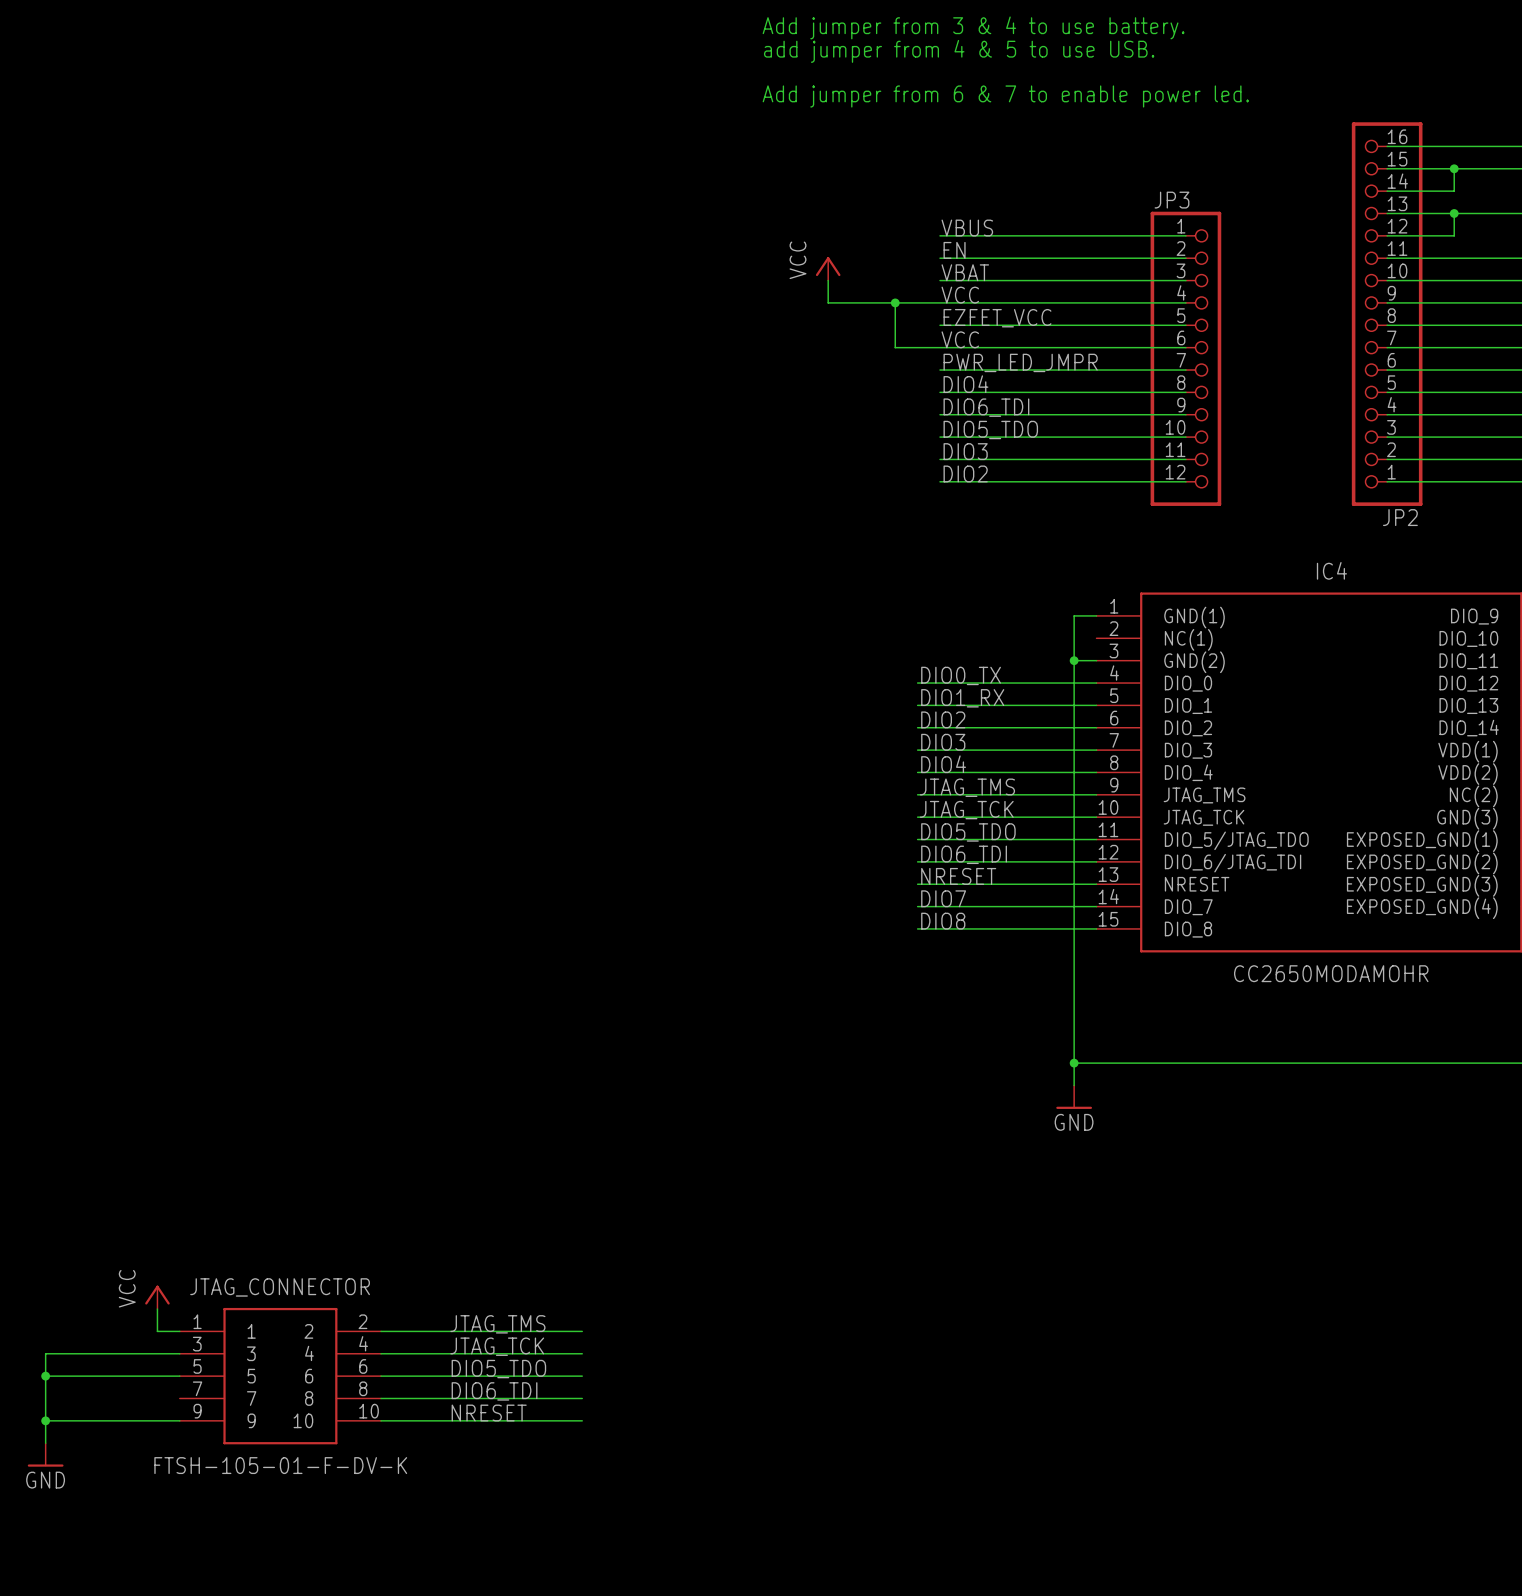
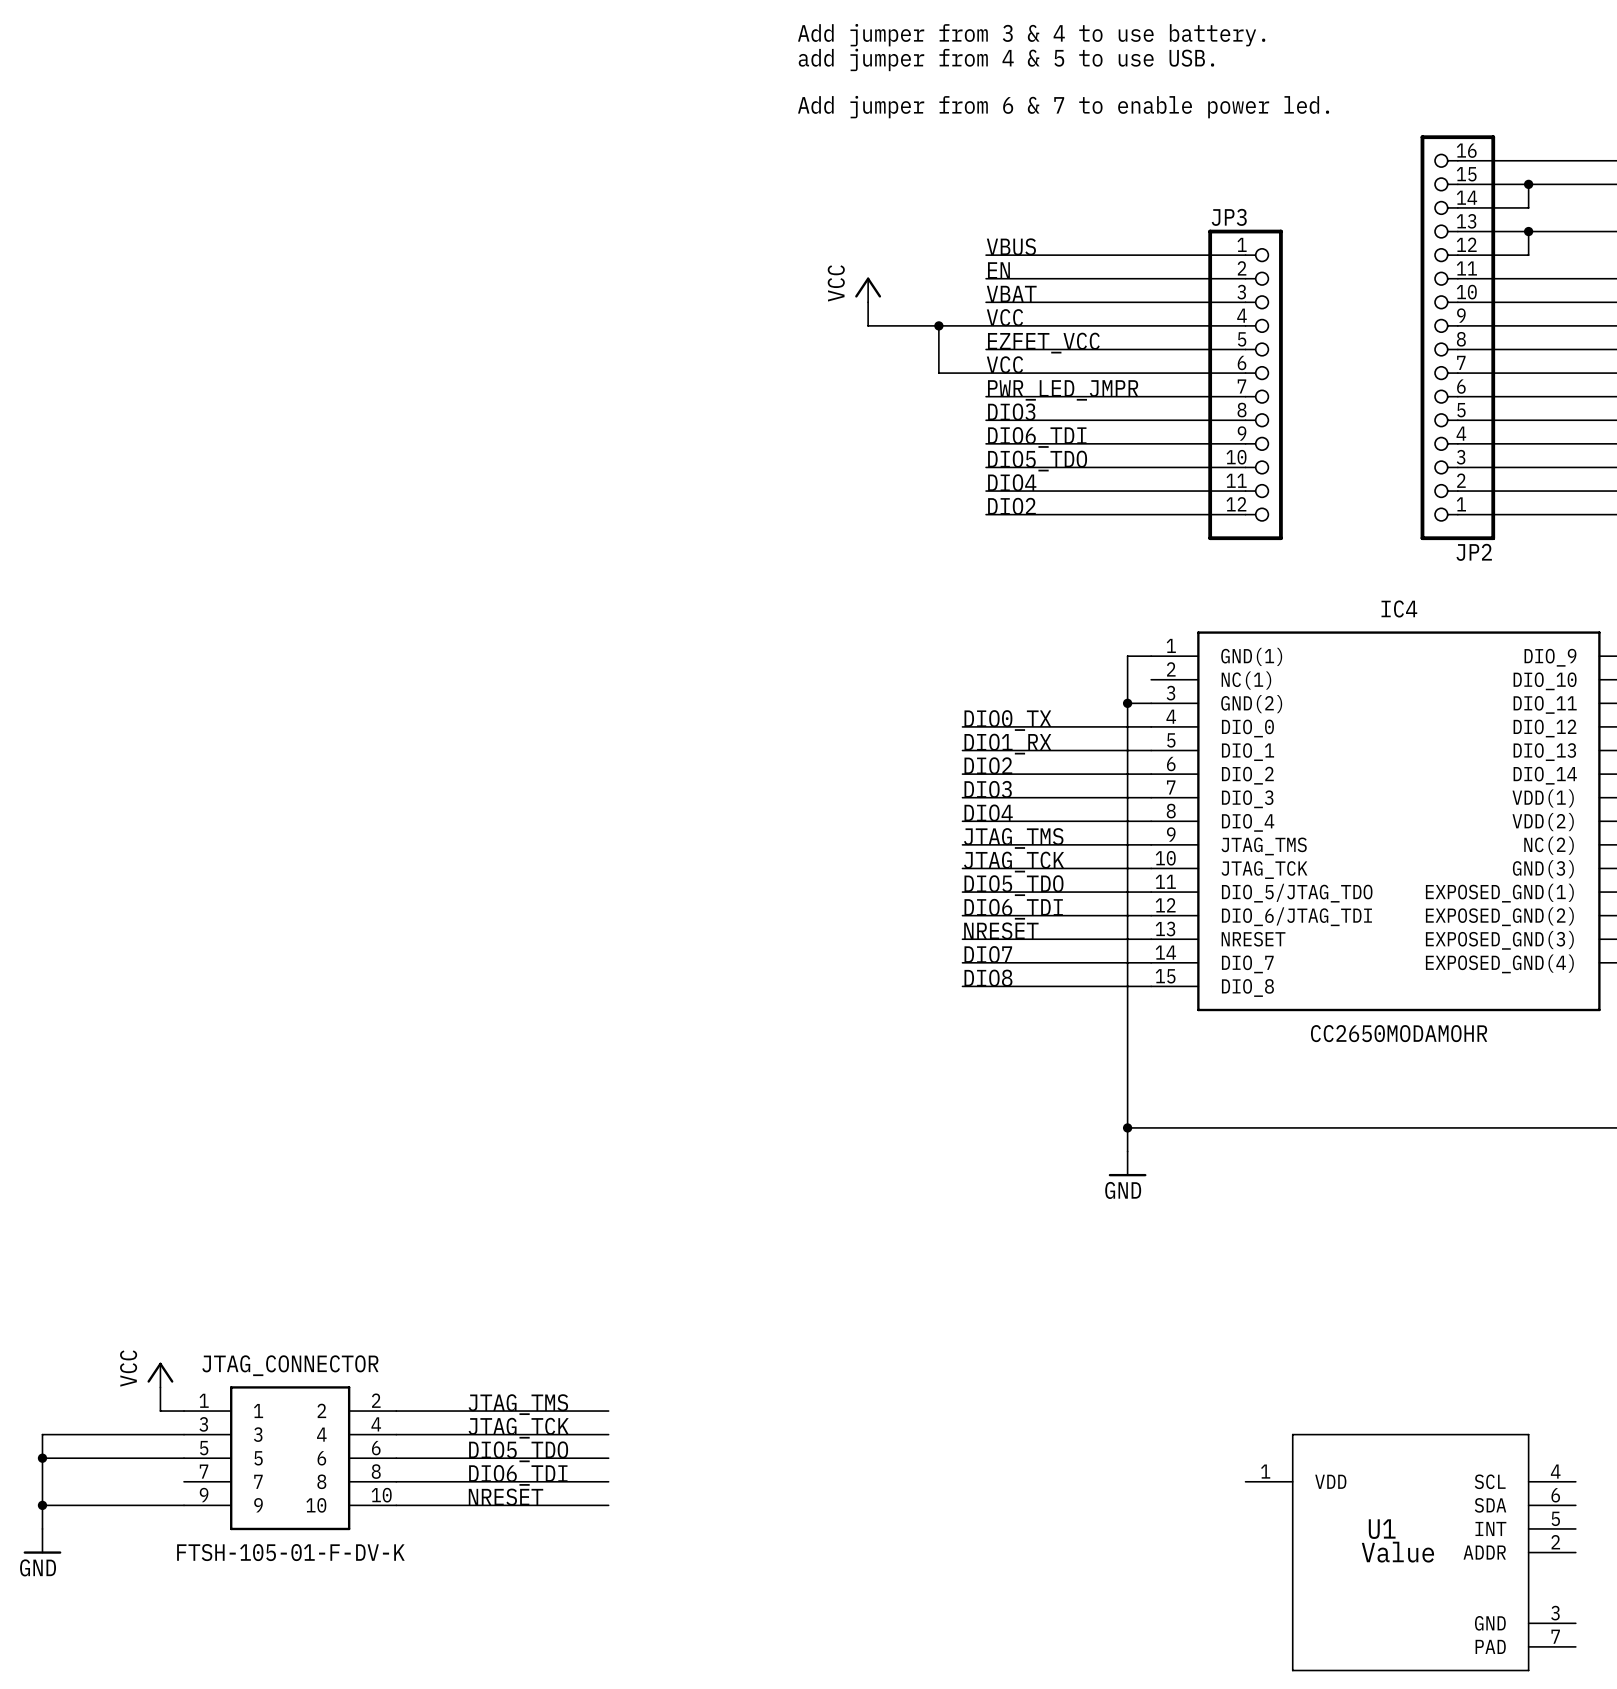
label: DIO4 (965, 384) -> DIO3 (1011, 412)
label: DIO3 (965, 451) -> DIO4 (1012, 482)
U1: none -> Value (1410, 1552)

